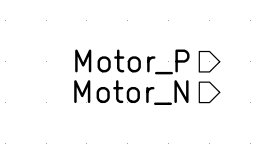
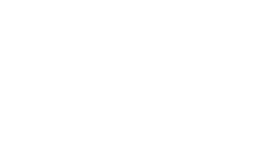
hierarchical label: Motor_P (132, 61) -> none
hierarchical label: Motor_N (131, 92) -> none

